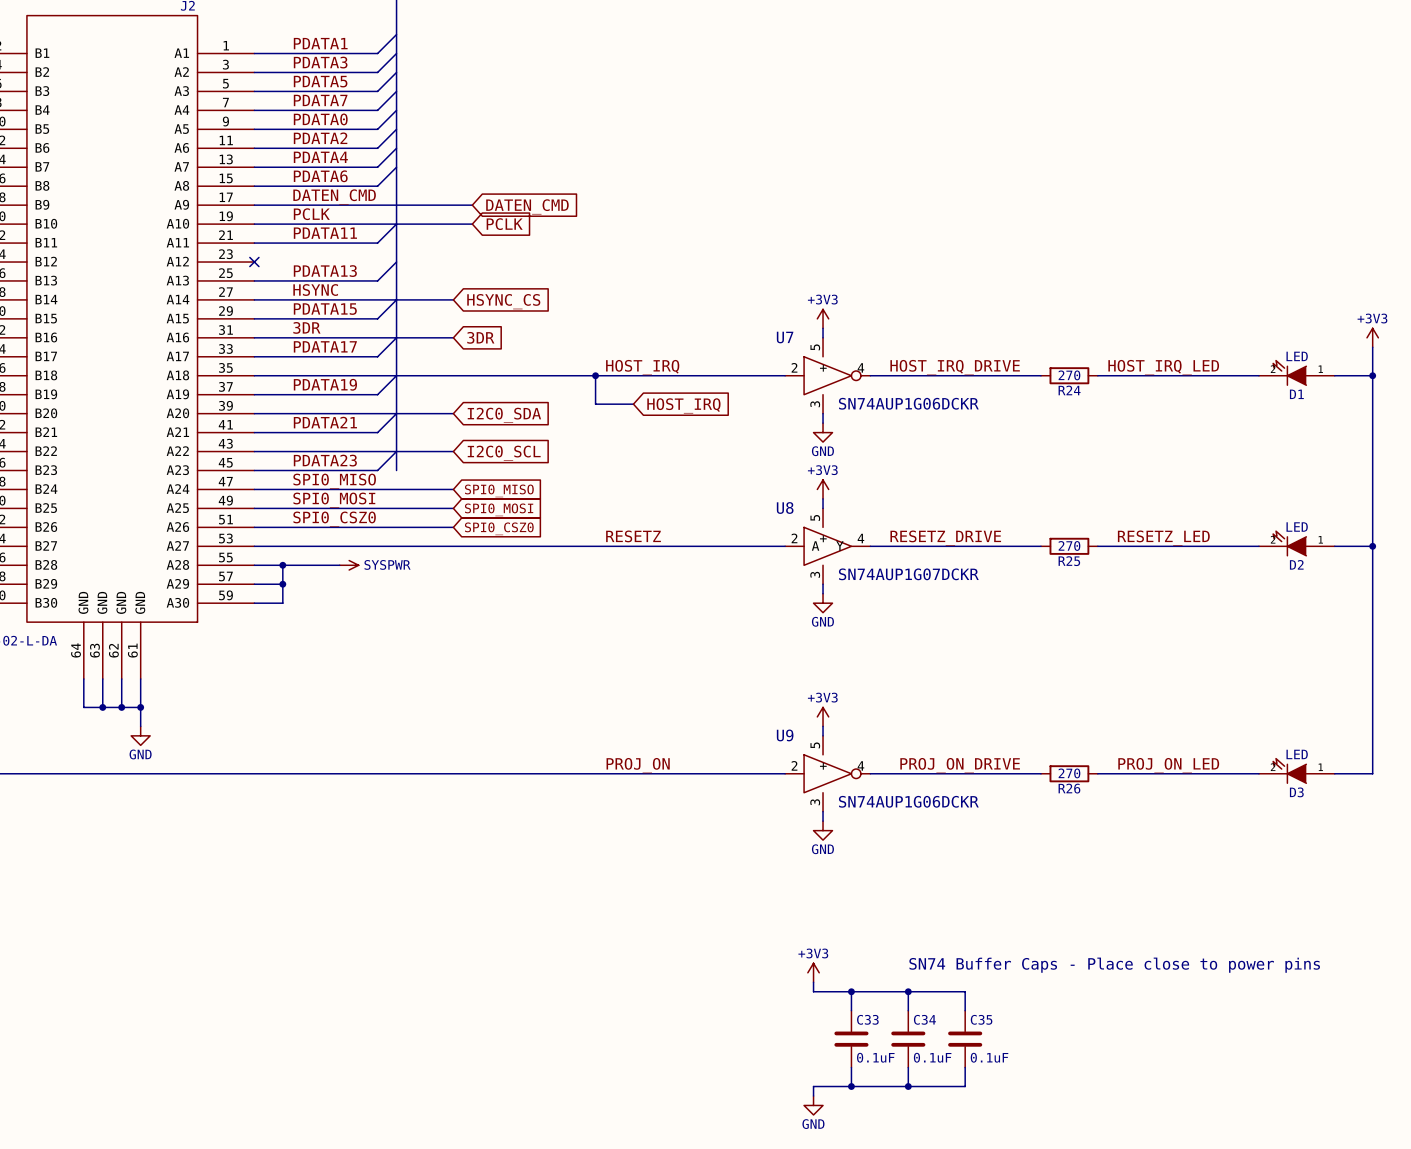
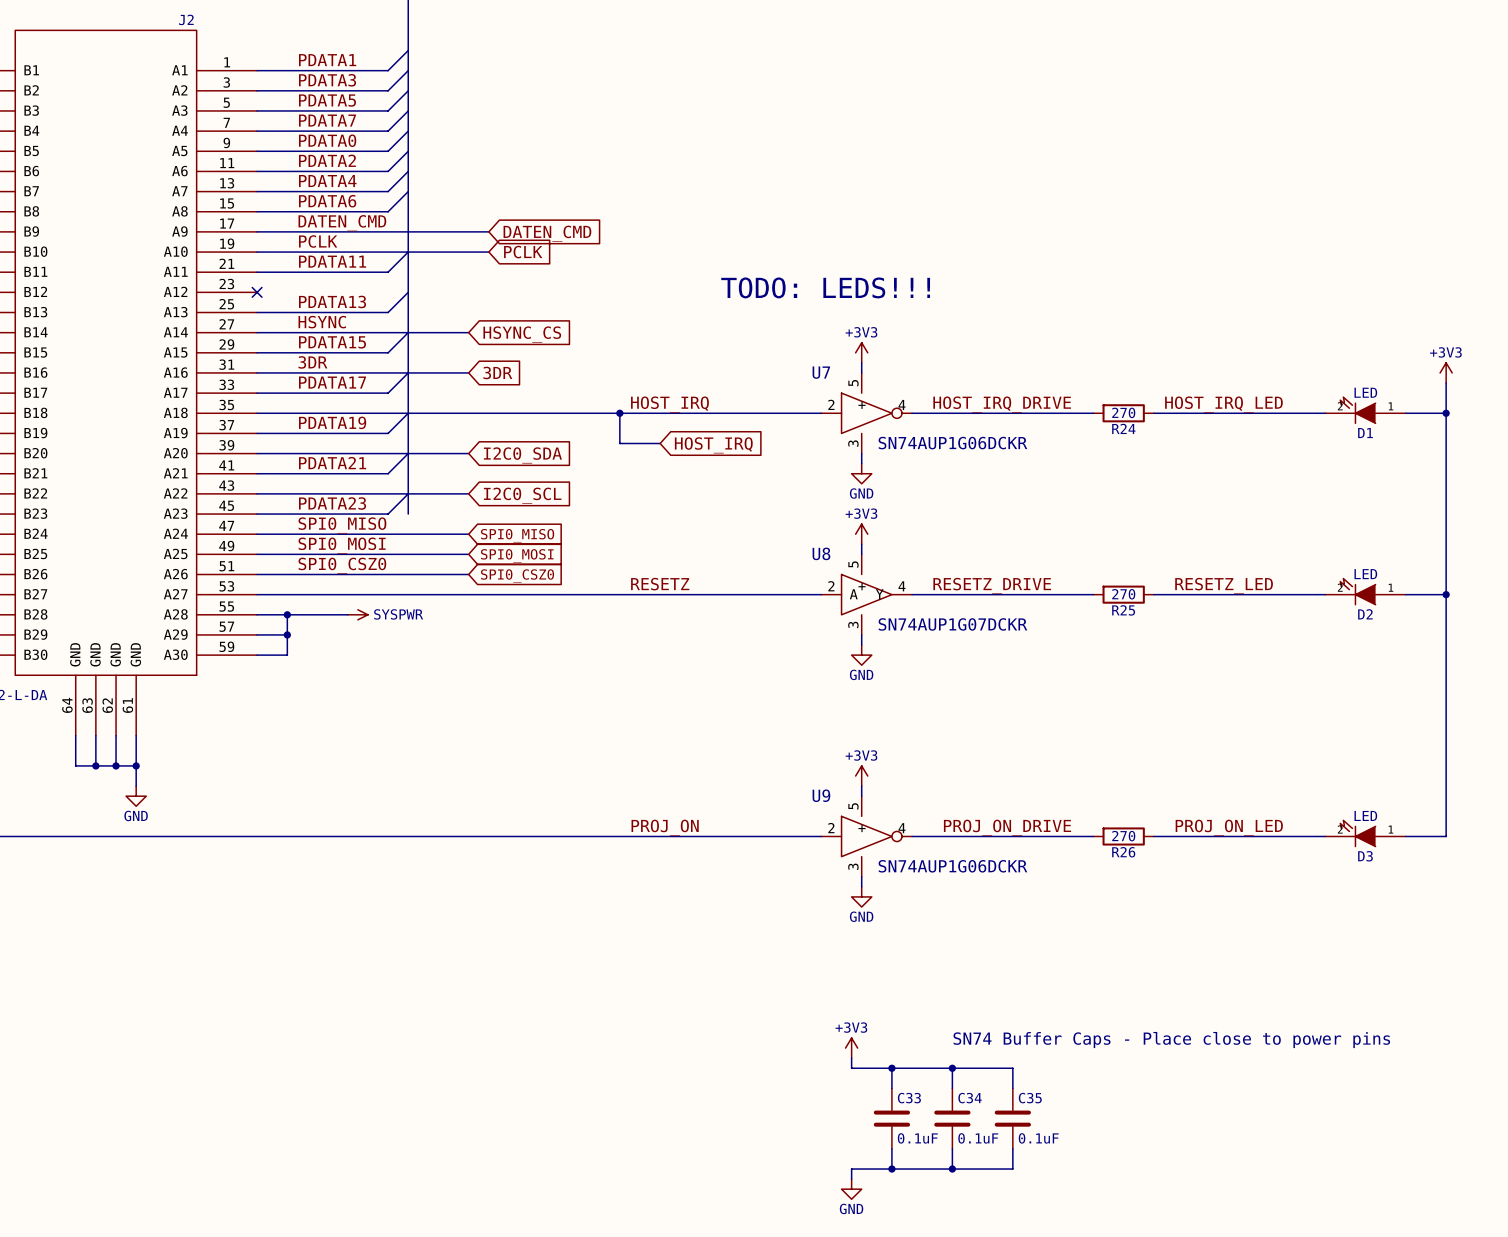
text: none -> TODO: LEDS!!! (825, 287)

